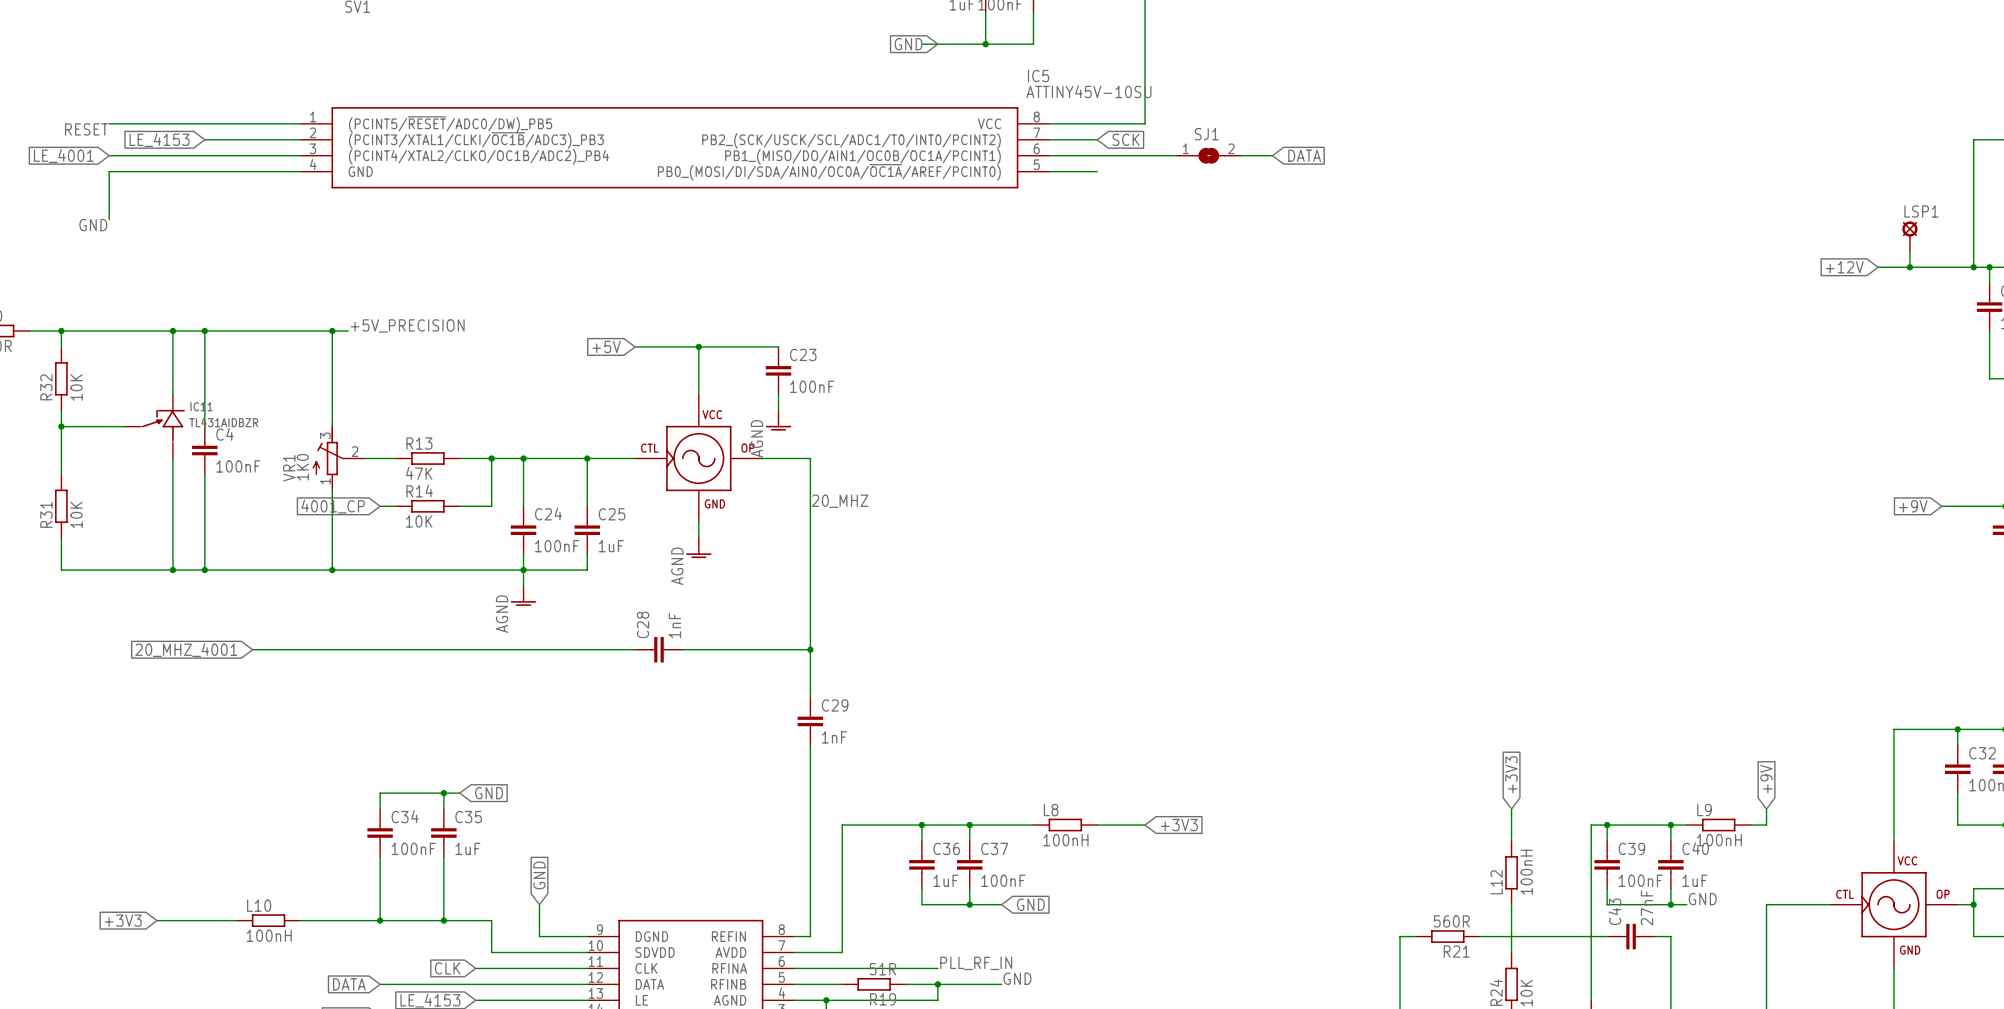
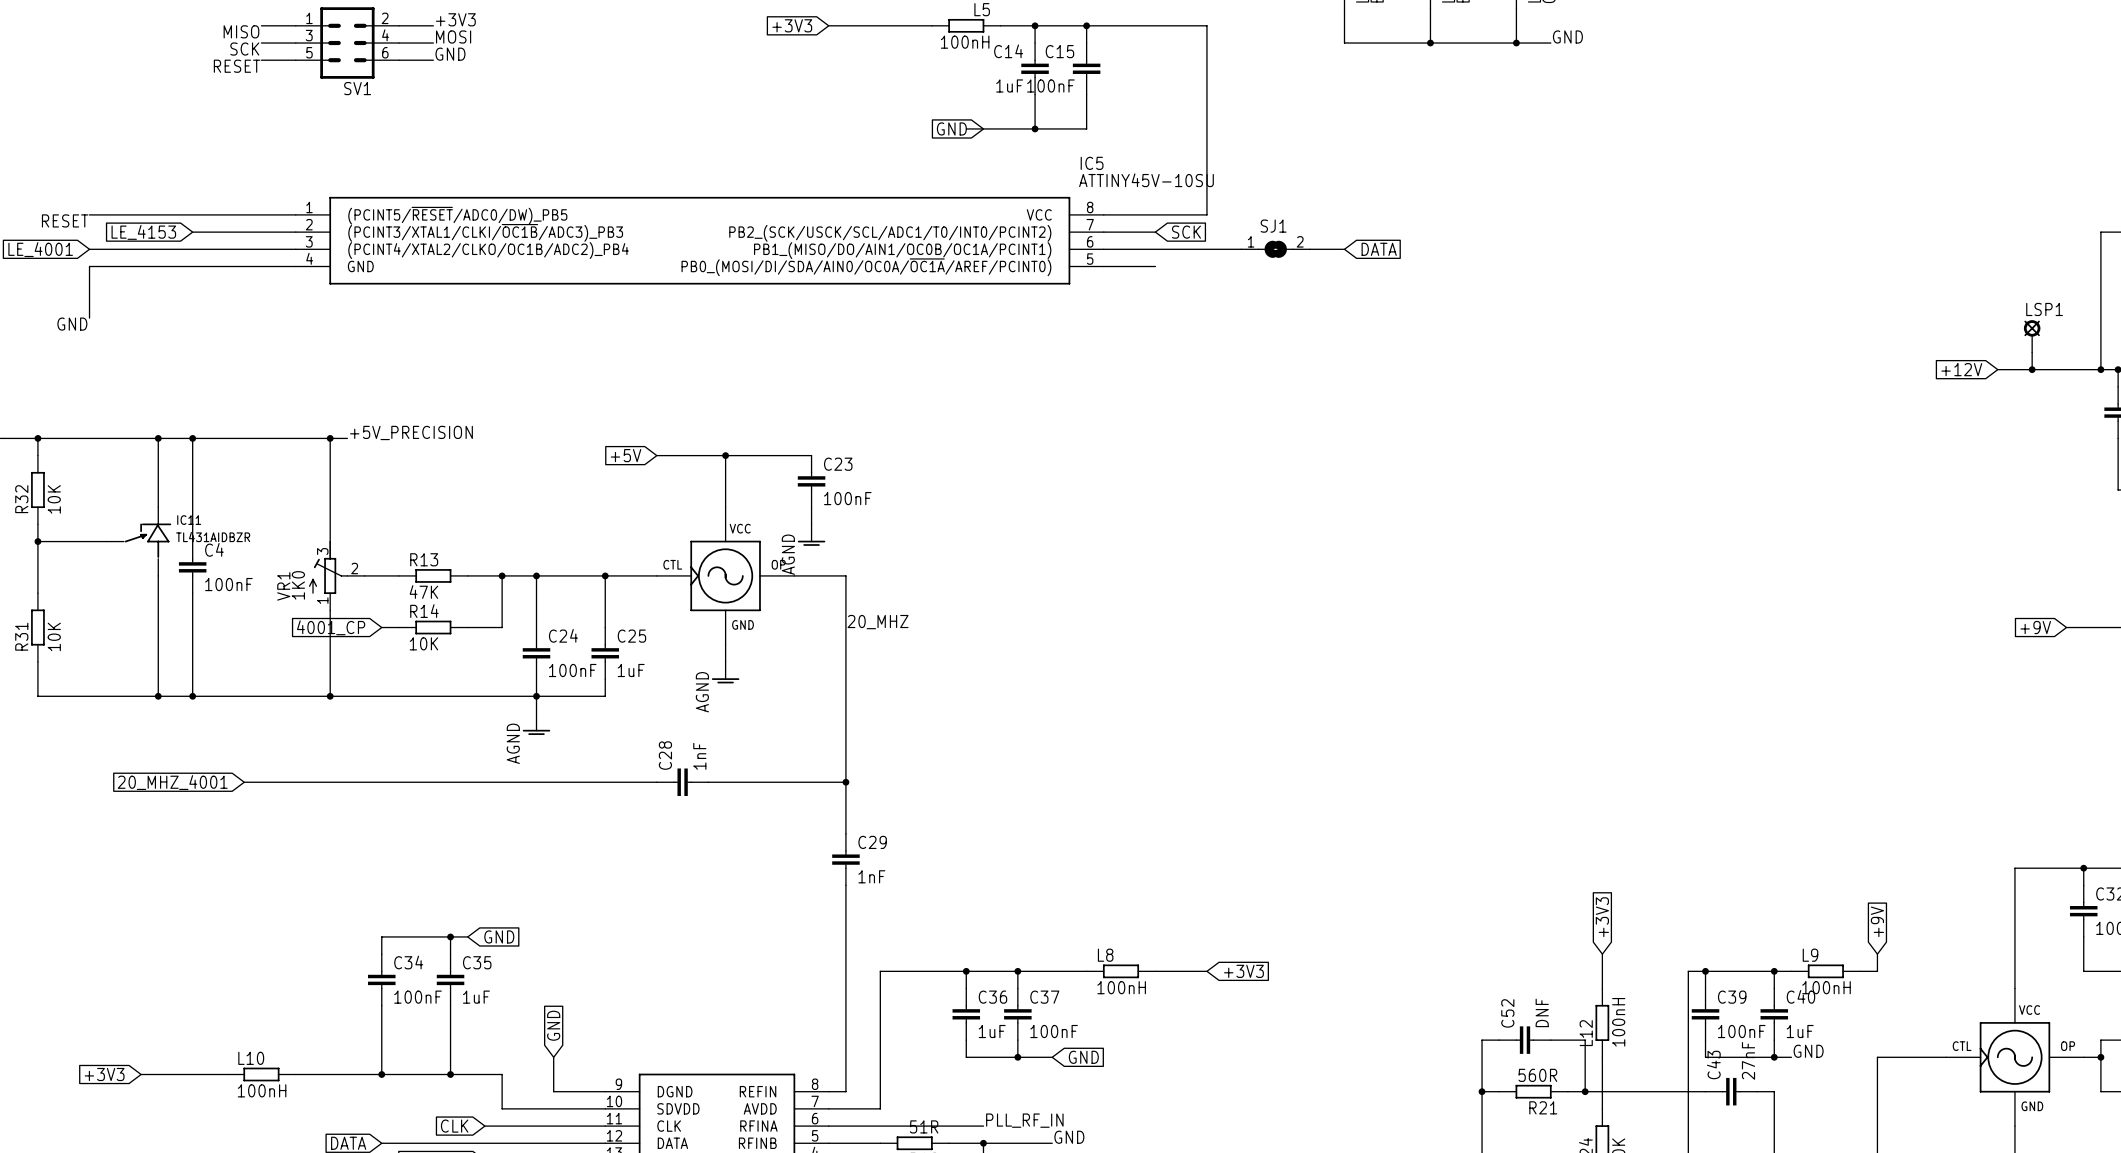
wire: none -> (1499, 1040) (1482, 1040) (1482, 1091)
C52: none -> DNF (1525, 1040)
wire: none -> (1550, 1040) (1585, 1040) (1585, 1091)
junction: none -> (1482, 1091)
junction: none -> (1585, 1091)

